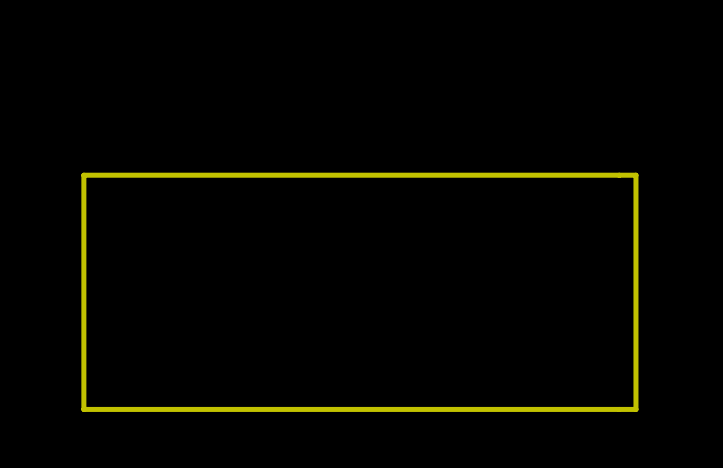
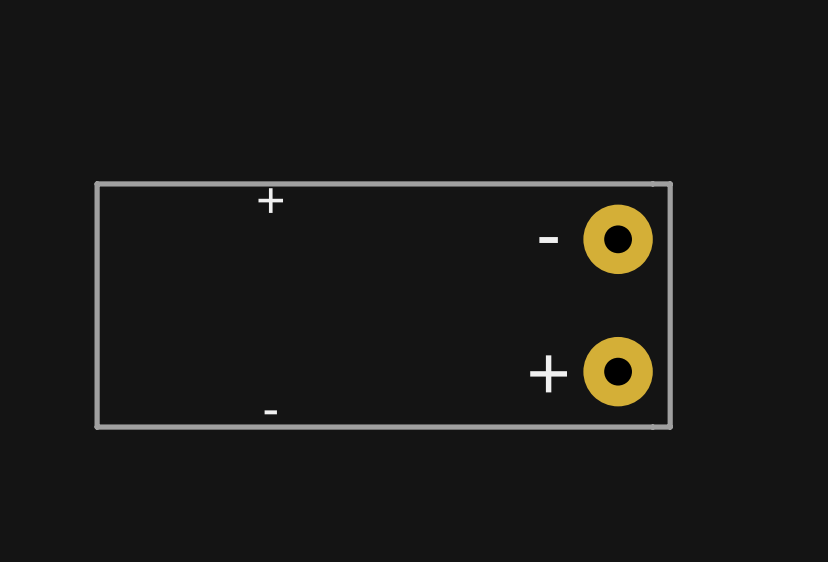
text: none -> + (270, 200)
text: none -> - (548, 240)
part: none -> (618, 305)
text: none -> + (548, 373)
text: none -> - (270, 412)

